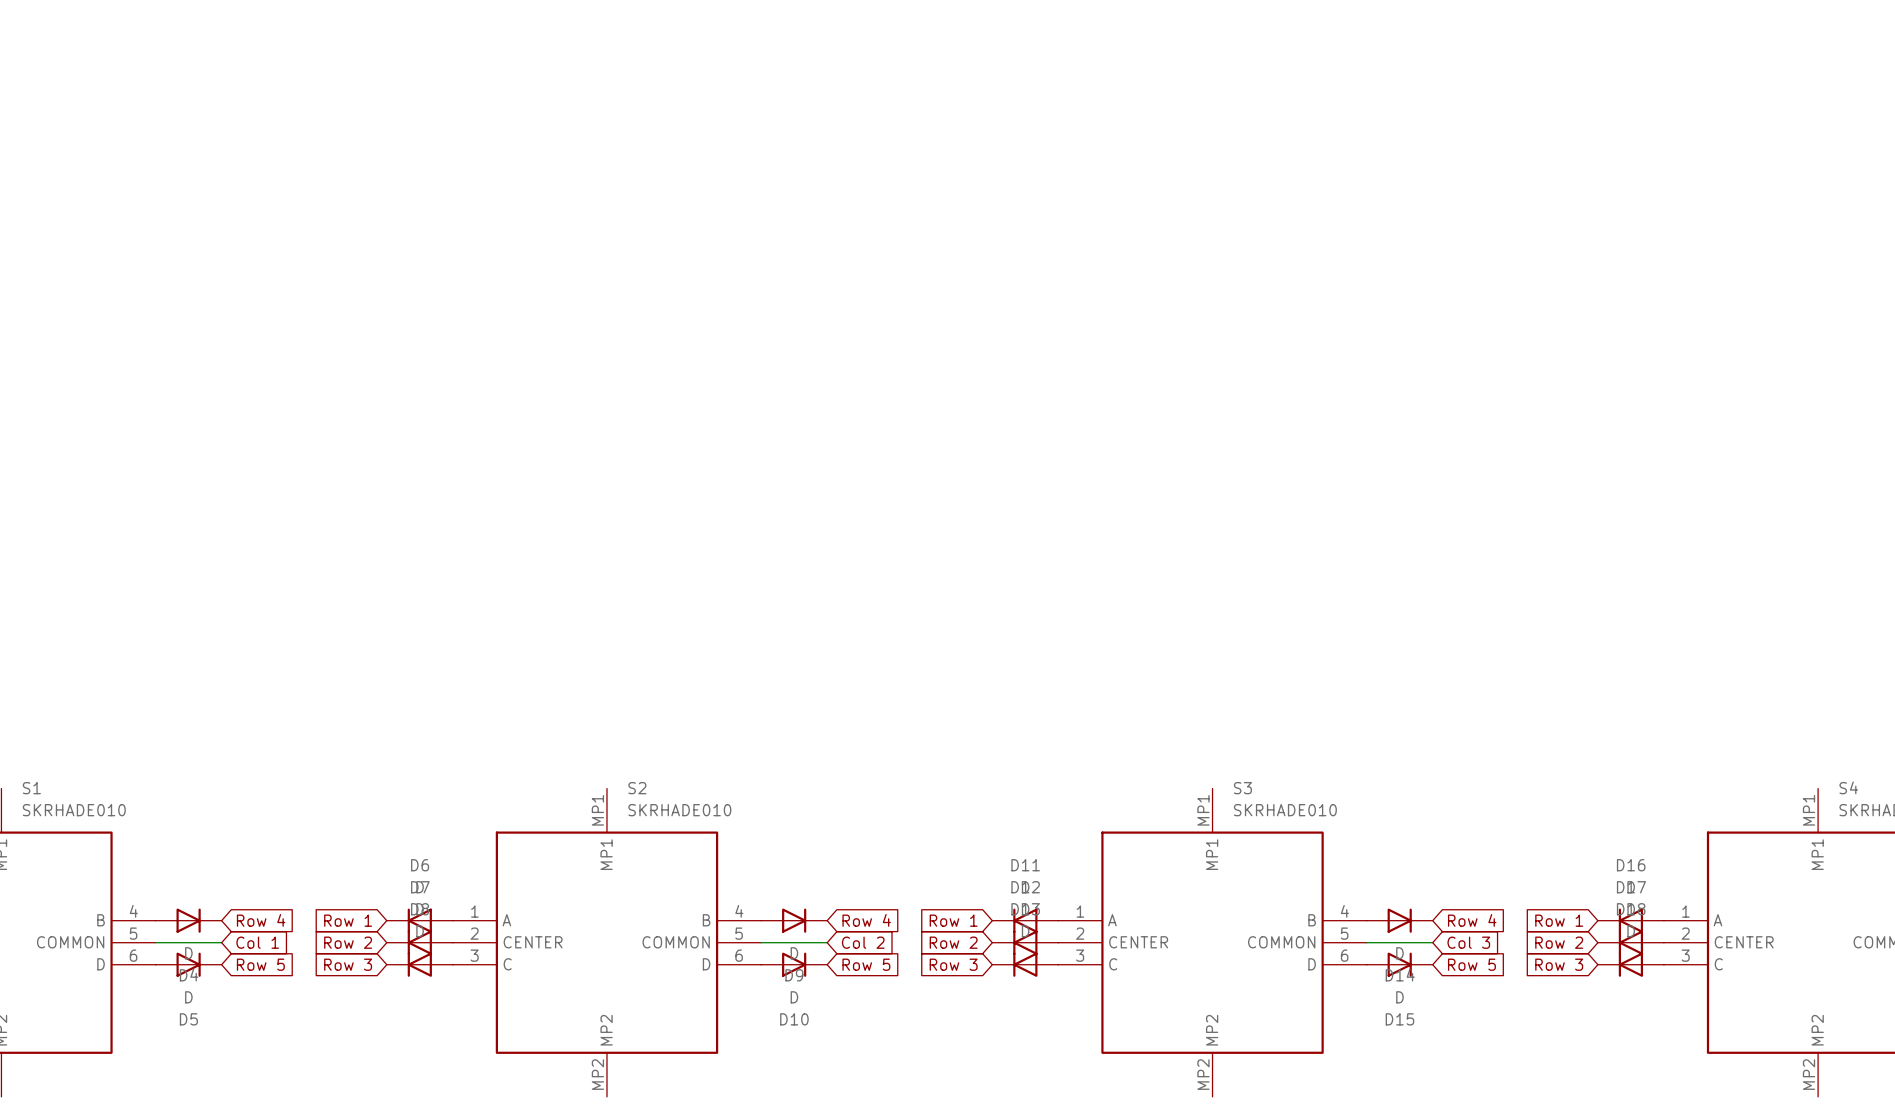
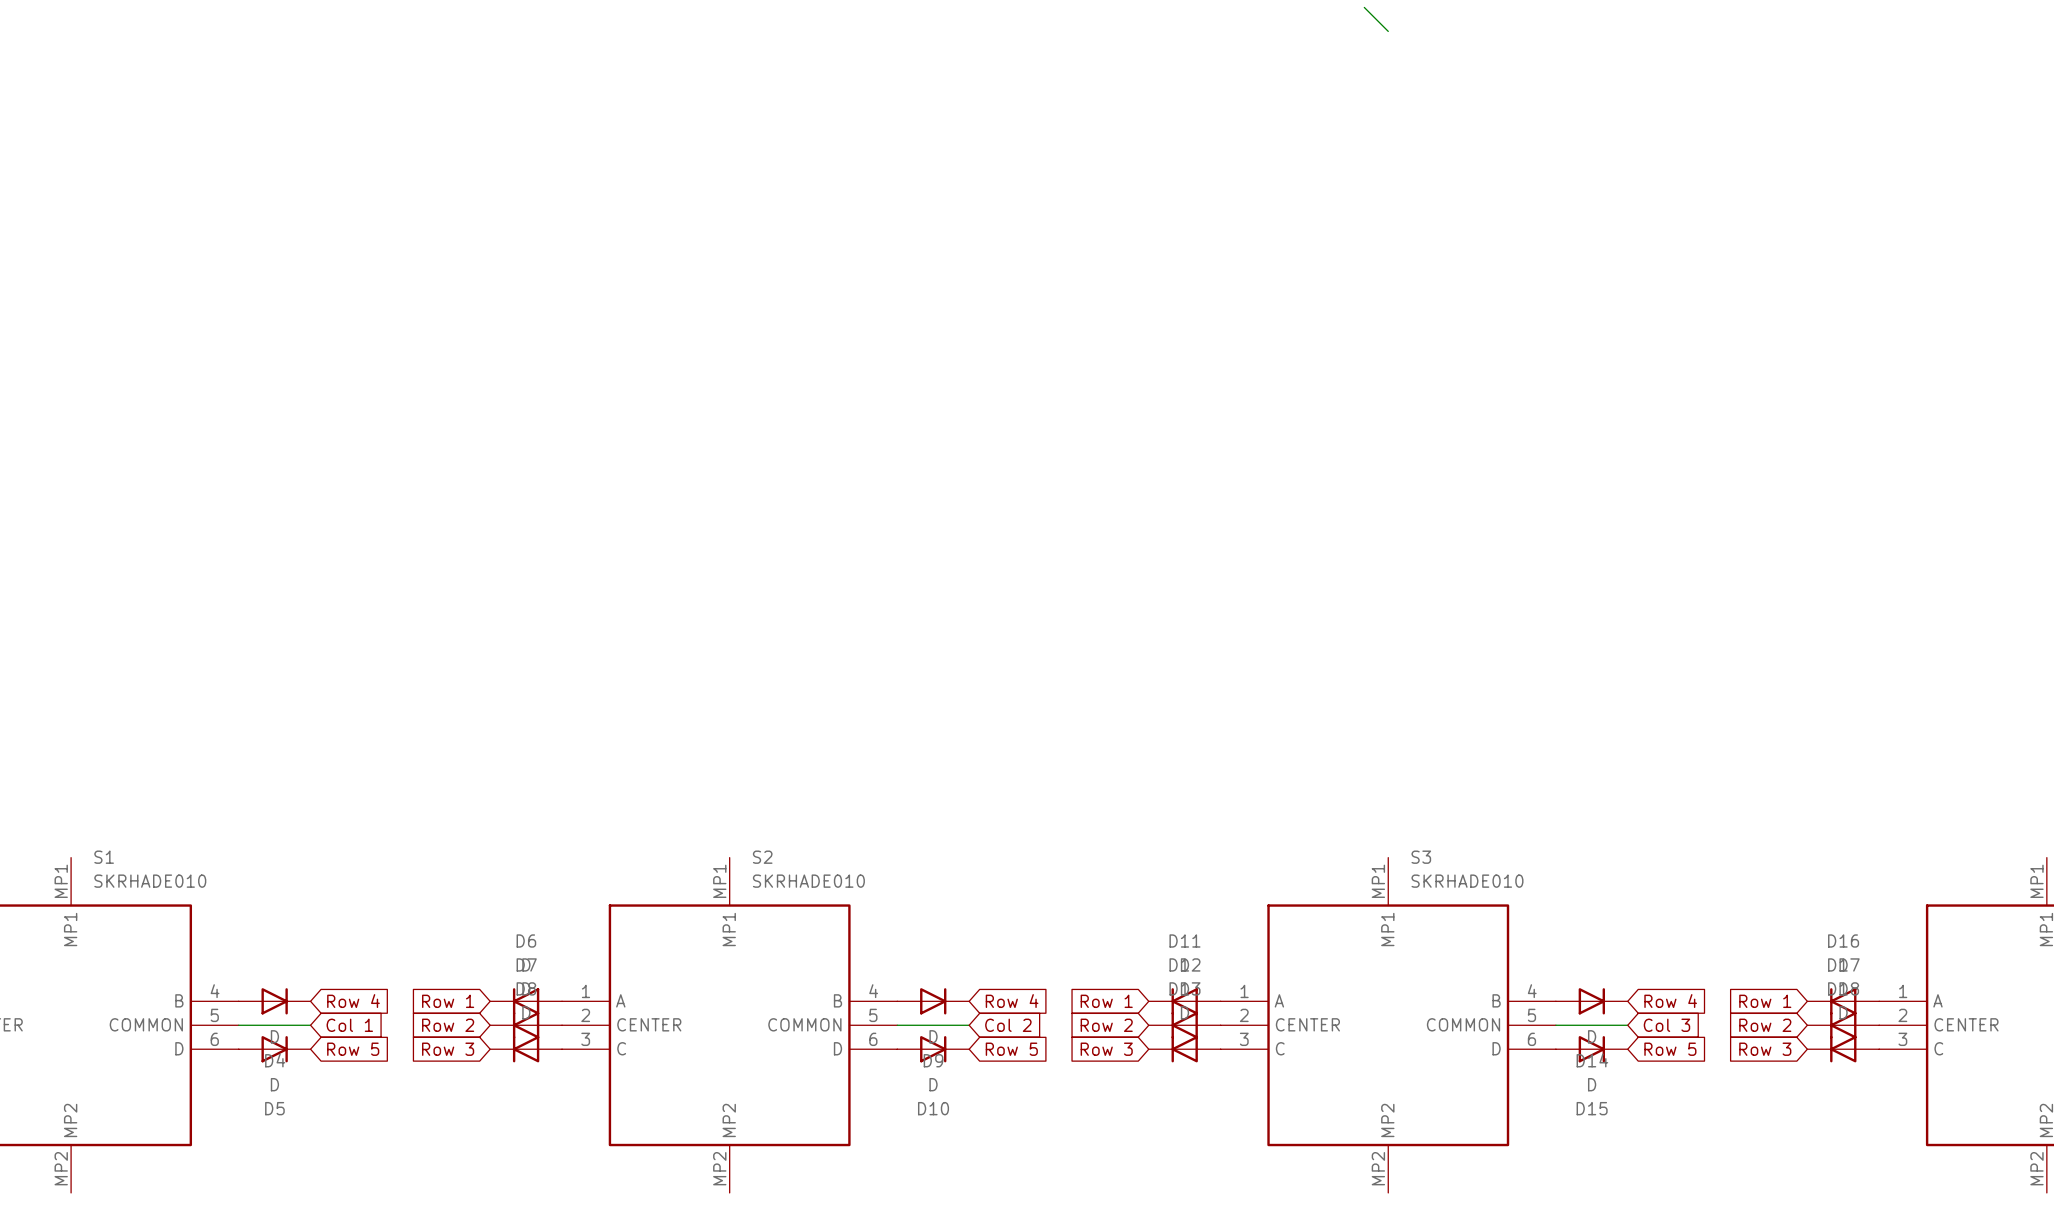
wire: none -> (1364, 7) (1388, 31)

